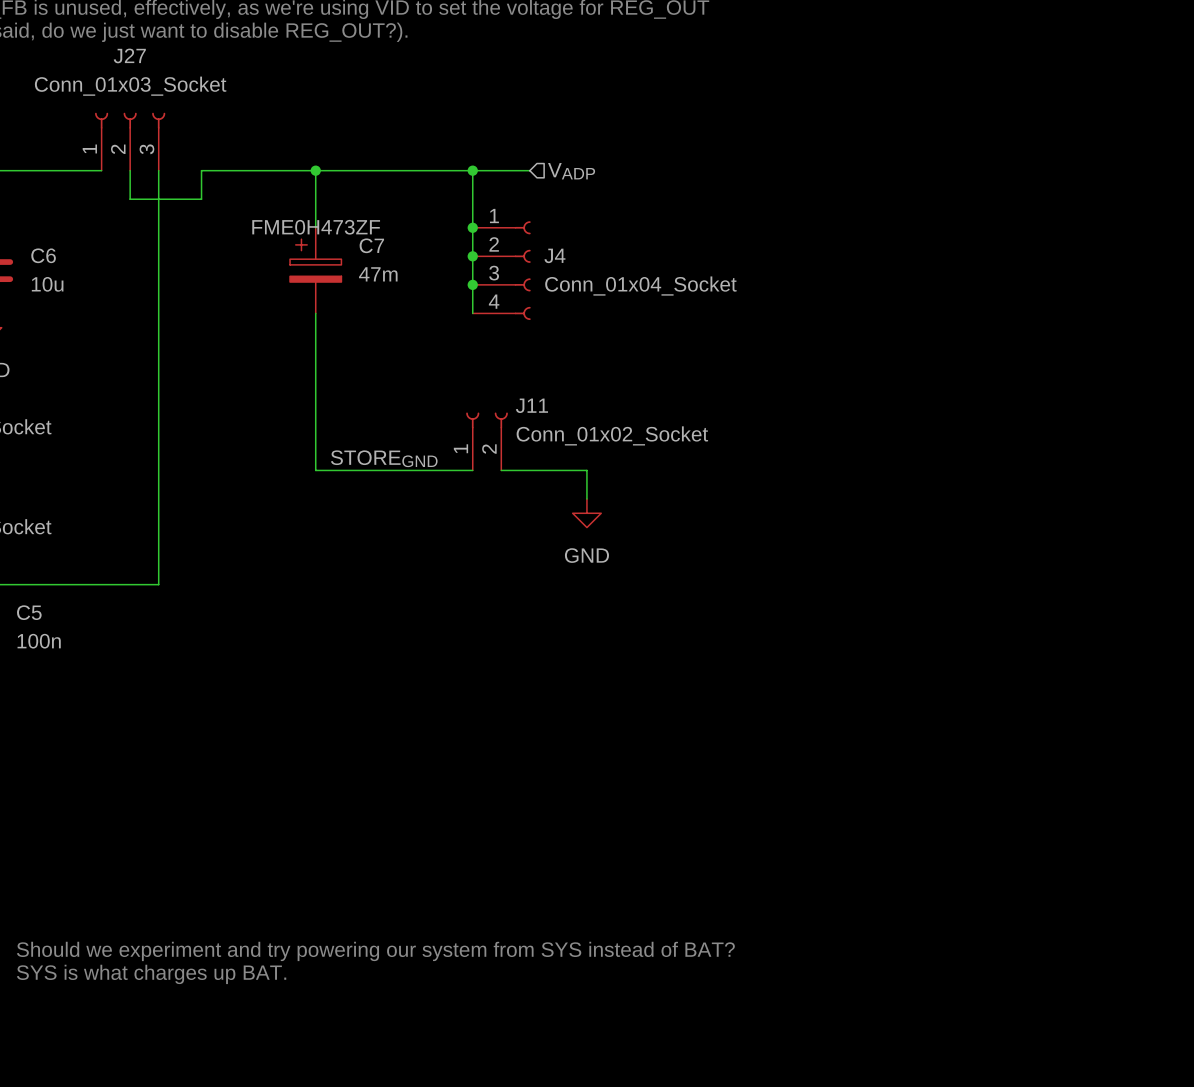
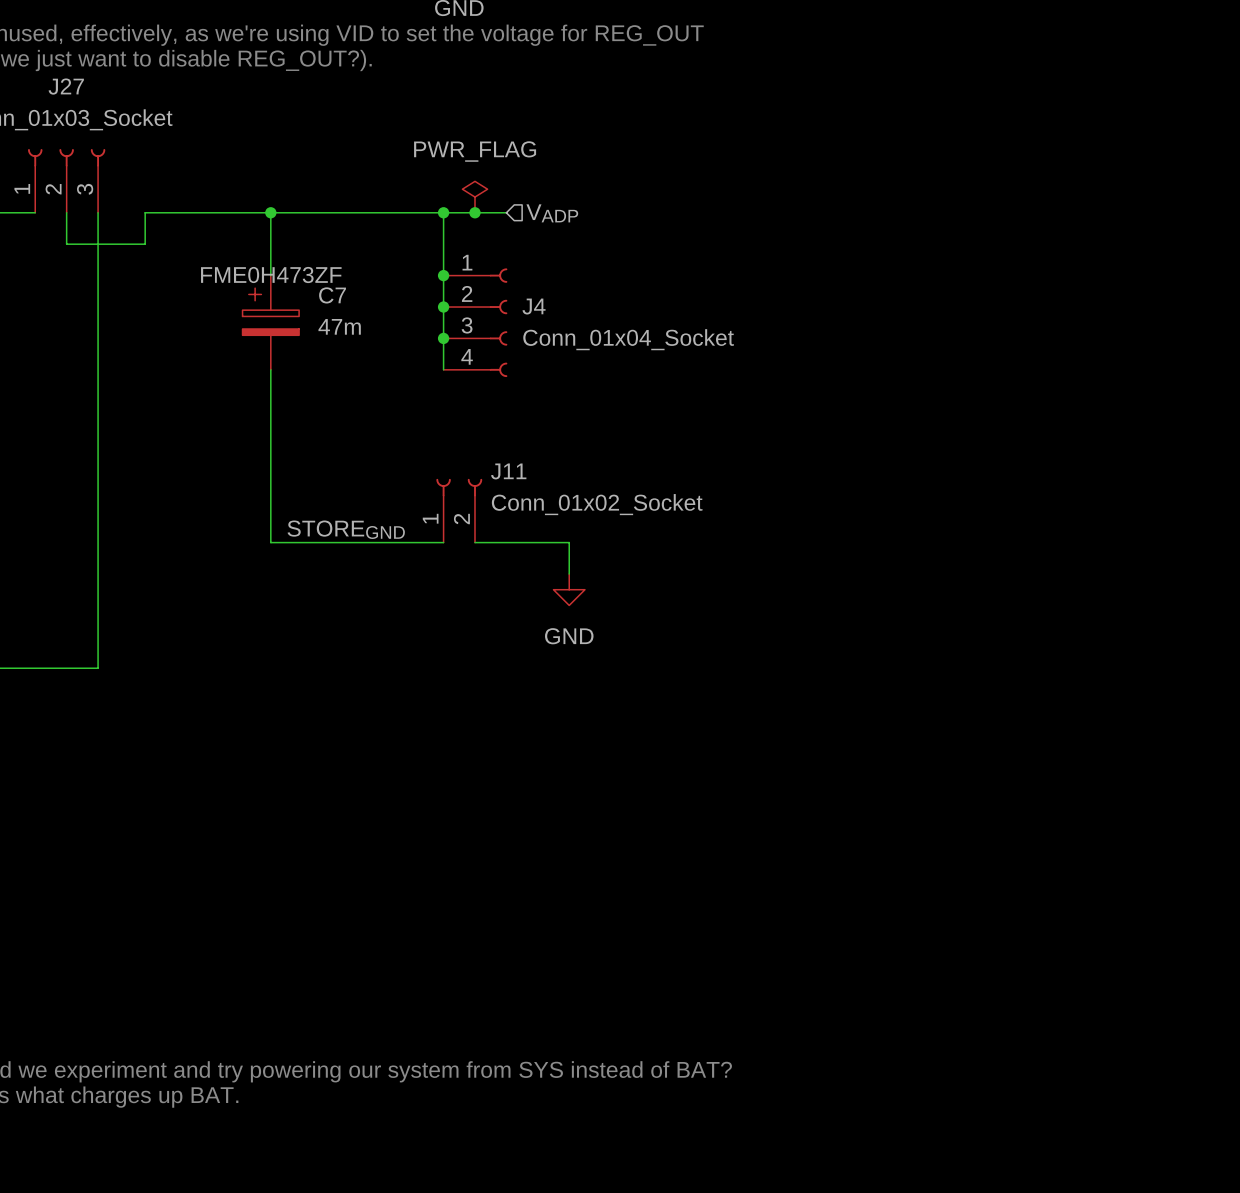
power symbol: none -> PWR_FLAG (474, 197)
junction: none -> (474, 212)

